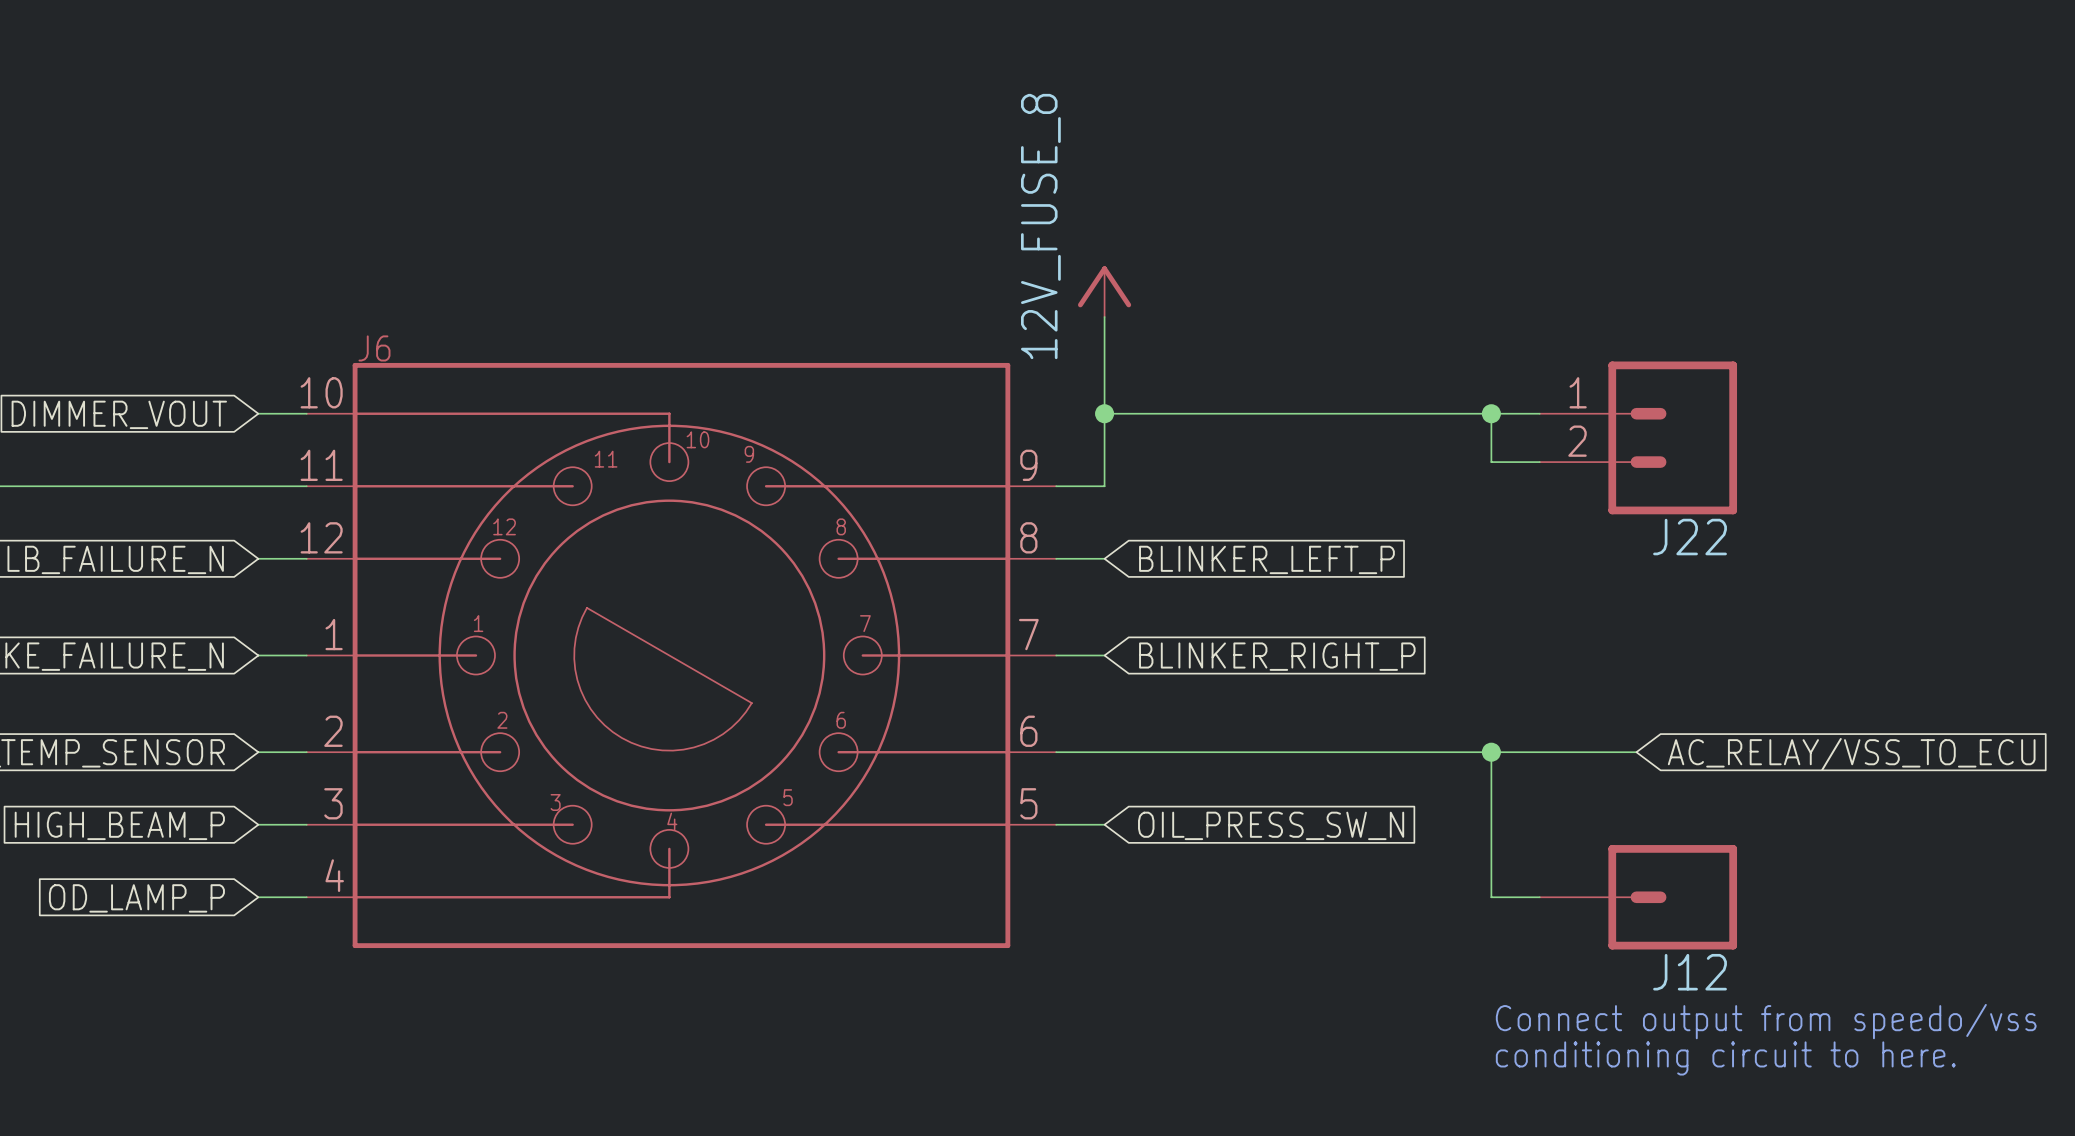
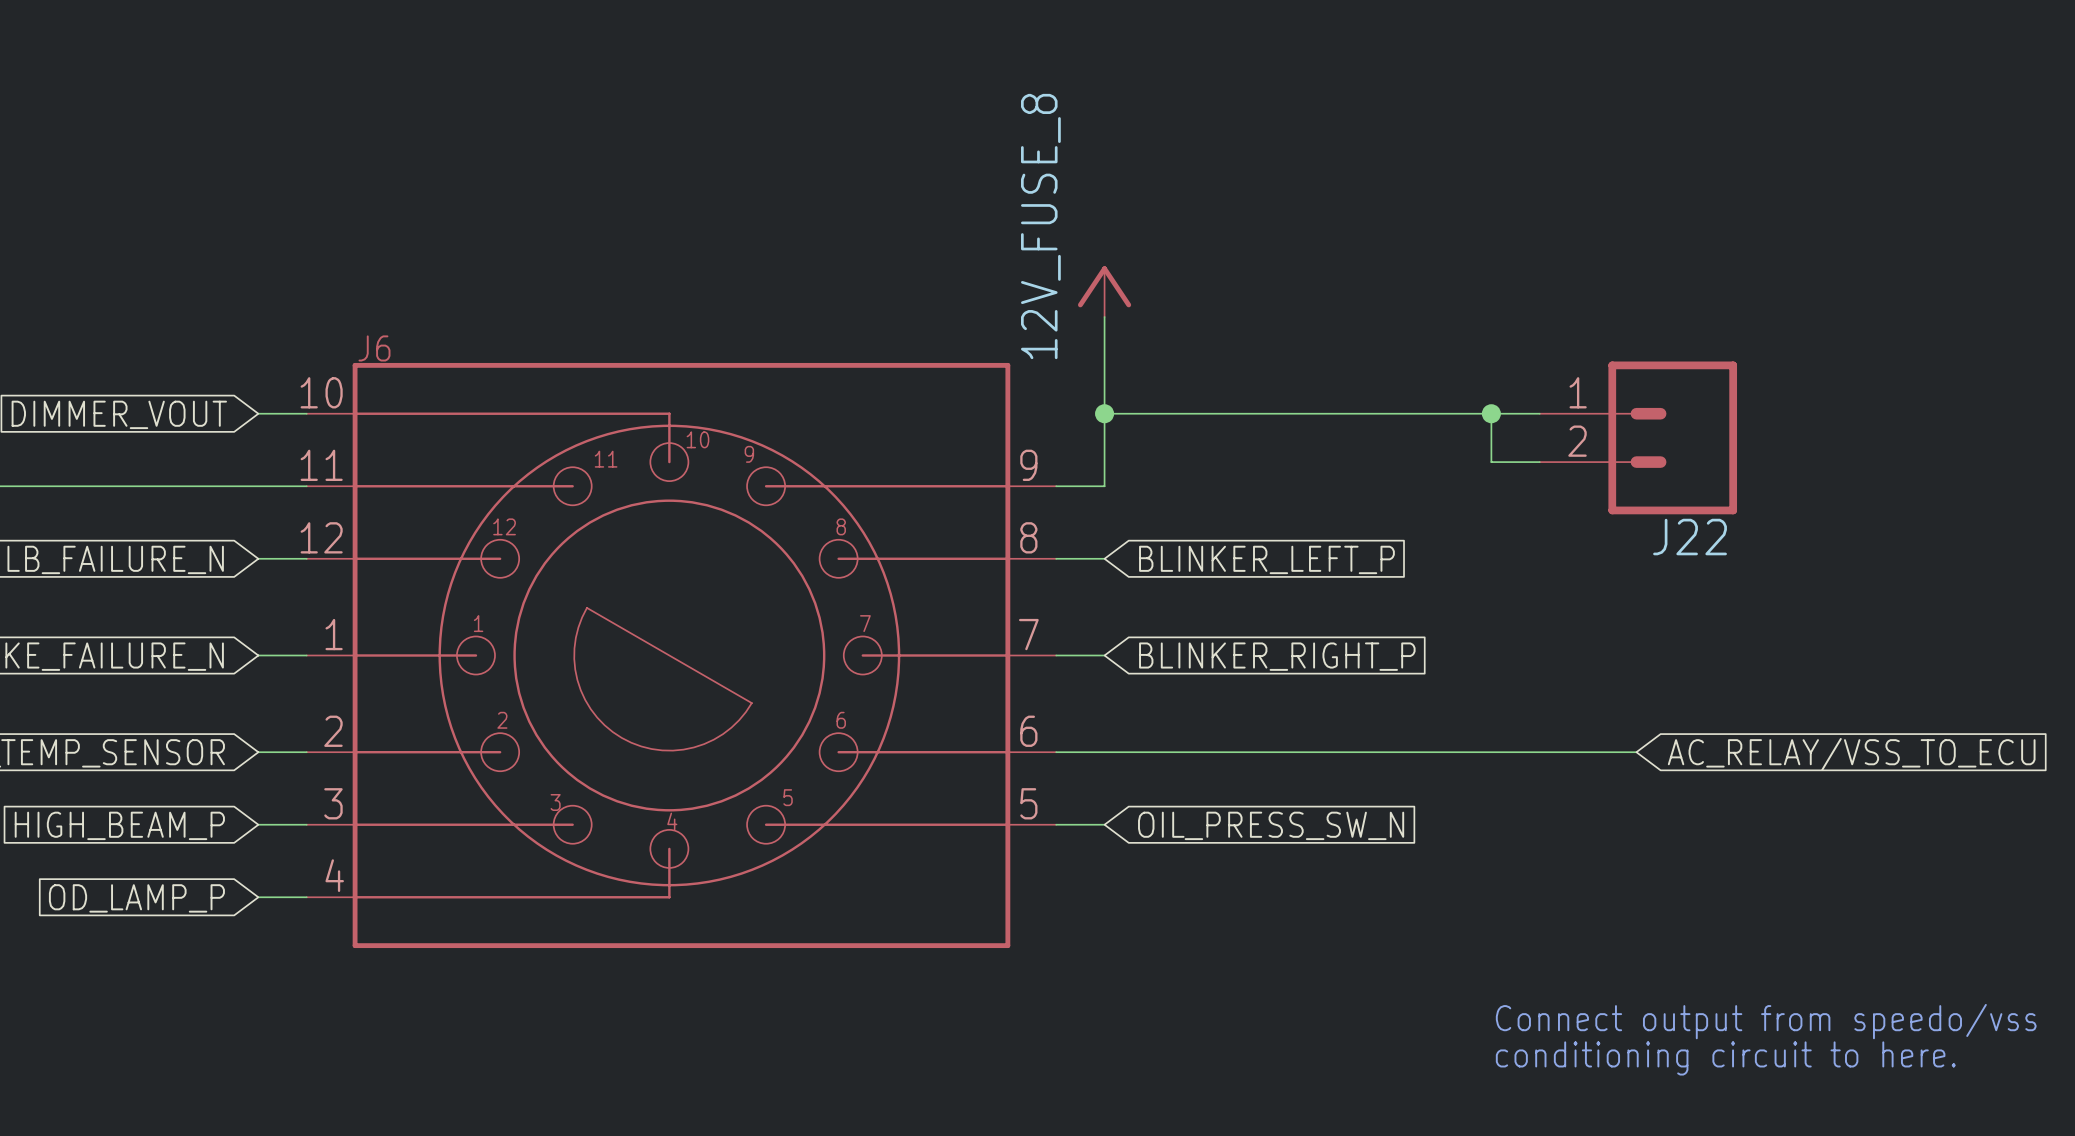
wire: (1491, 752) (1491, 897) (1539, 897) -> none
junction: (1491, 752) -> none
J12: (1638, 897) -> none

